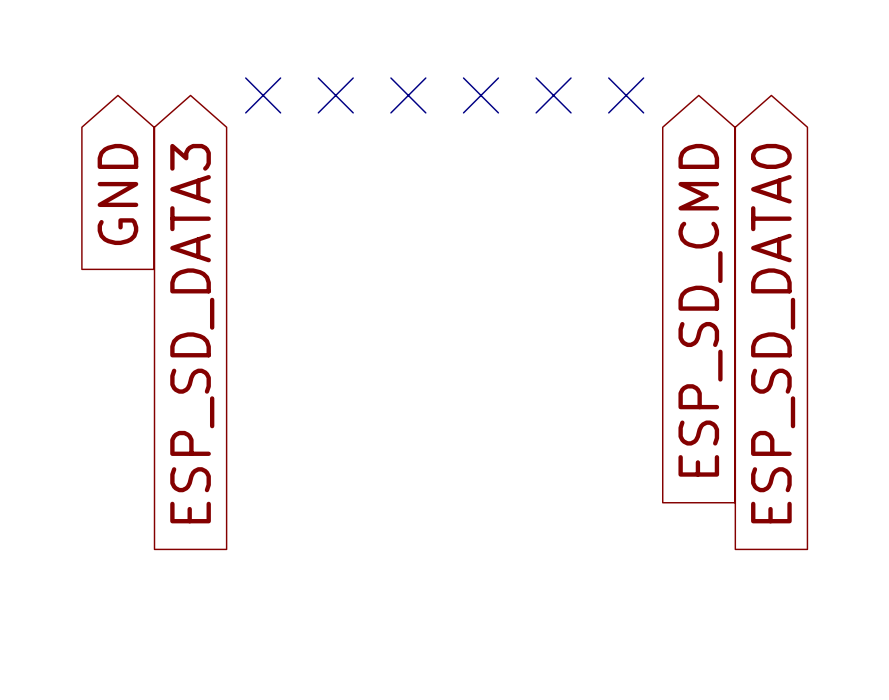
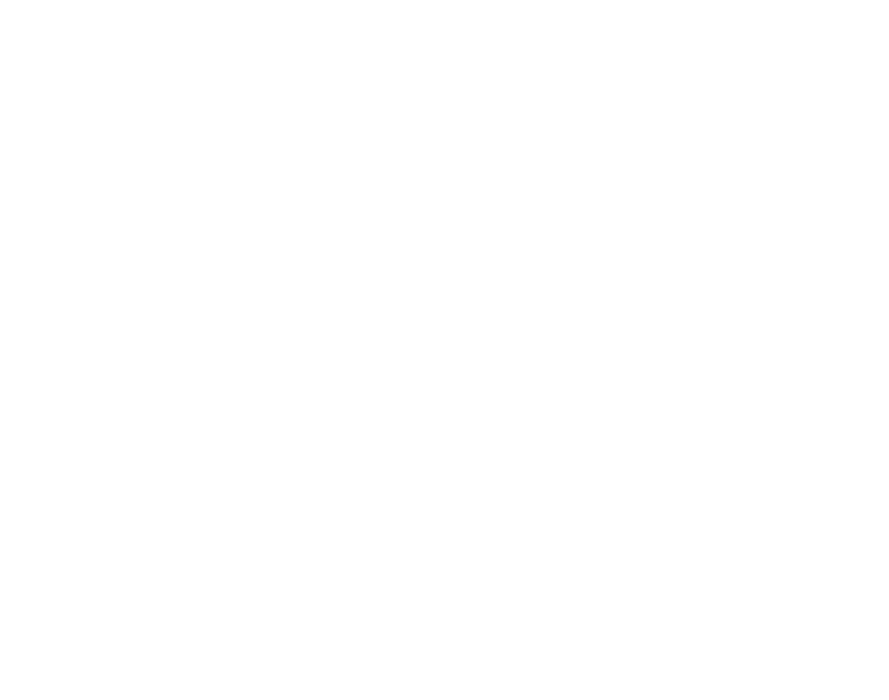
no-connect mark: (263, 95) -> none
no-connect mark: (335, 95) -> none
no-connect mark: (408, 95) -> none
no-connect mark: (480, 95) -> none
no-connect mark: (553, 95) -> none
no-connect mark: (626, 95) -> none
global label: GND (117, 194) -> none
global label: ESP_SD_CMD (700, 310) -> none
global label: ESP_SD_DATA3 (192, 333) -> none
global label: ESP_SD_DATA0 (773, 333) -> none

